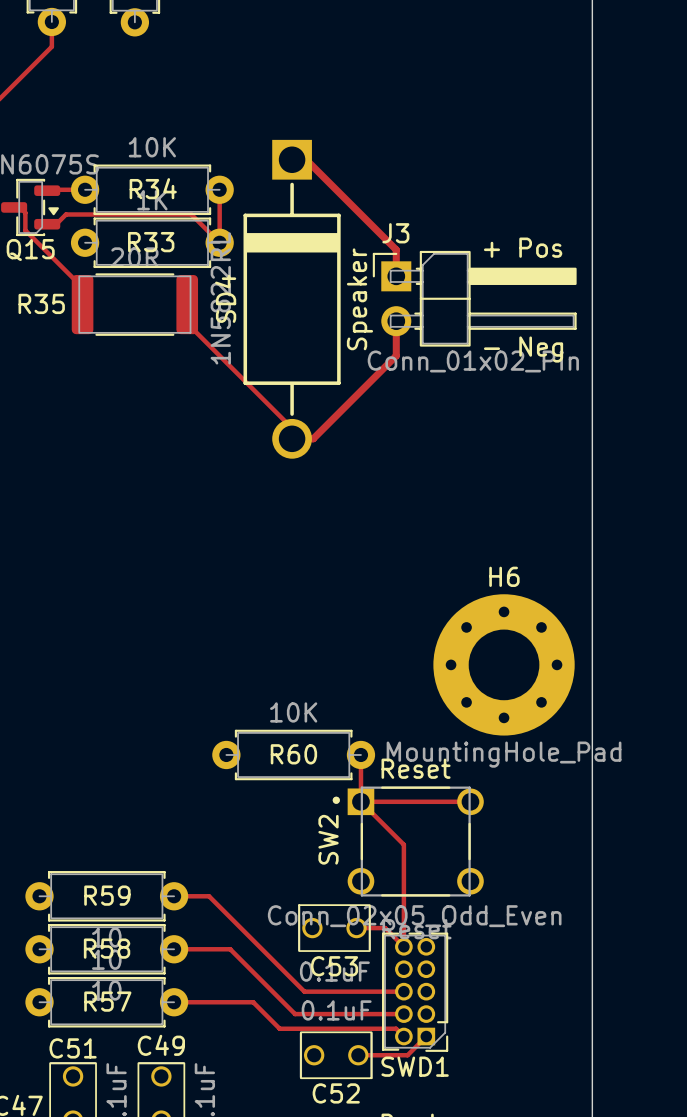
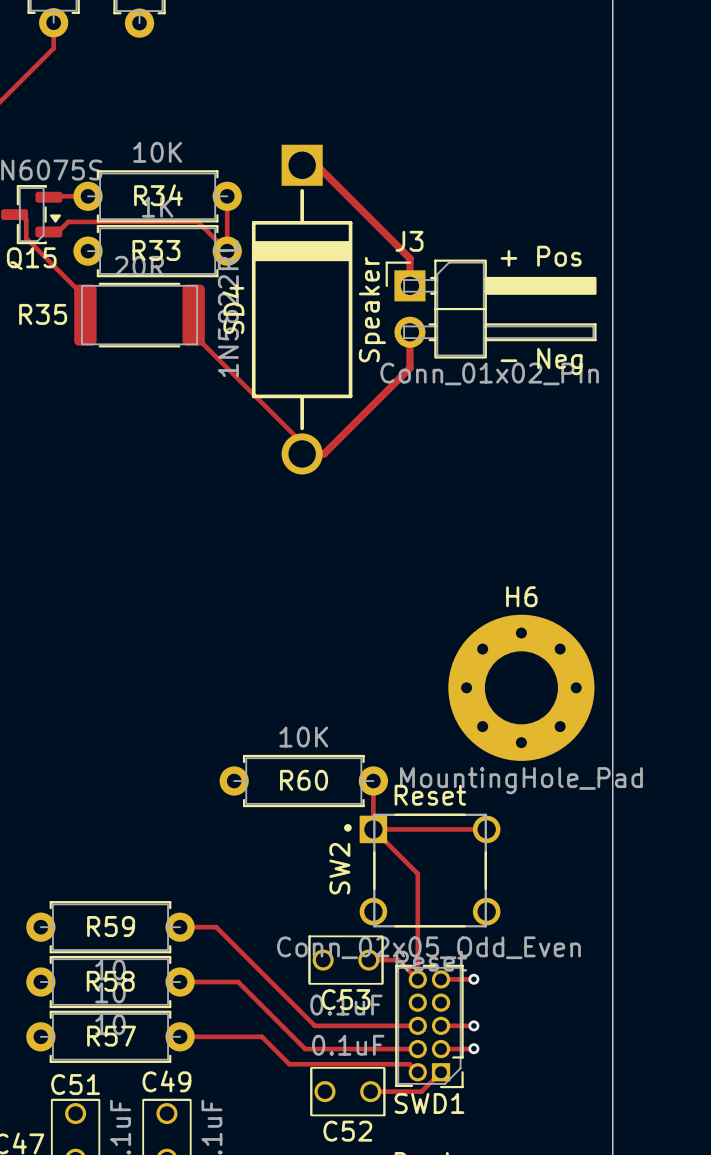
track: none -> (441, 979) (473, 979)
via: none -> (473, 979)
track: none -> (441, 1025) (473, 1025)
via: none -> (473, 1025)
track: none -> (473, 1048) (441, 1049)
via: none -> (473, 1048)

